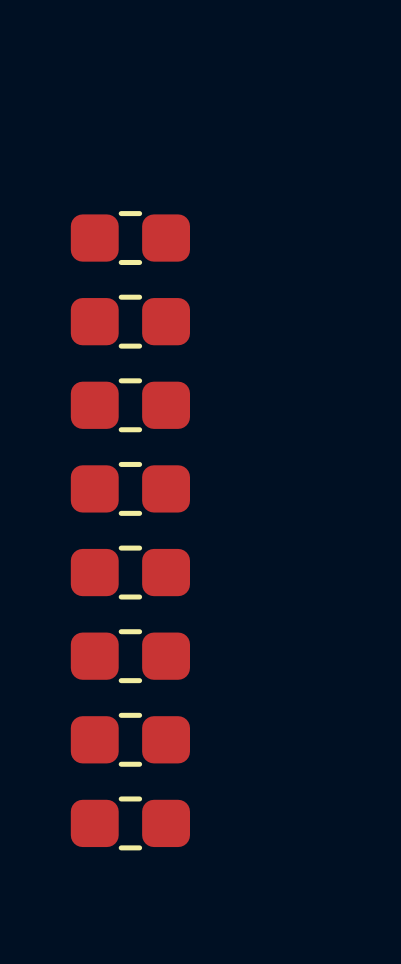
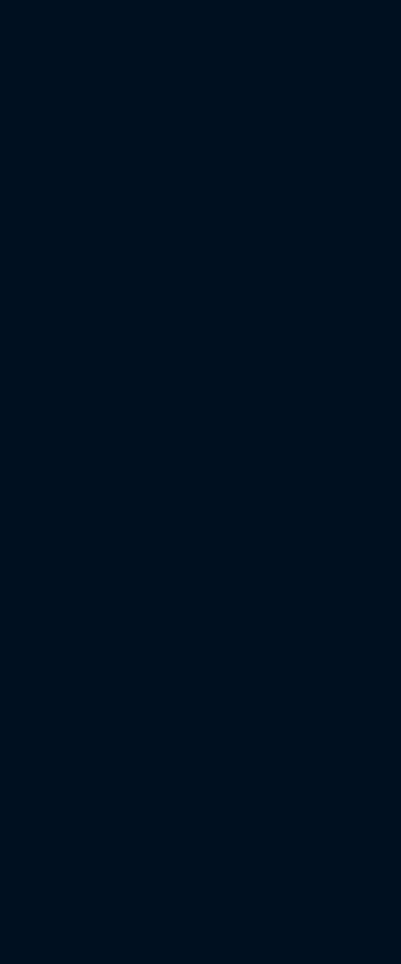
part: (130, 238) -> none
part: (130, 321) -> none
part: (130, 405) -> none
part: (130, 488) -> none
part: (130, 572) -> none
part: (130, 656) -> none
part: (130, 739) -> none
part: (130, 823) -> none

